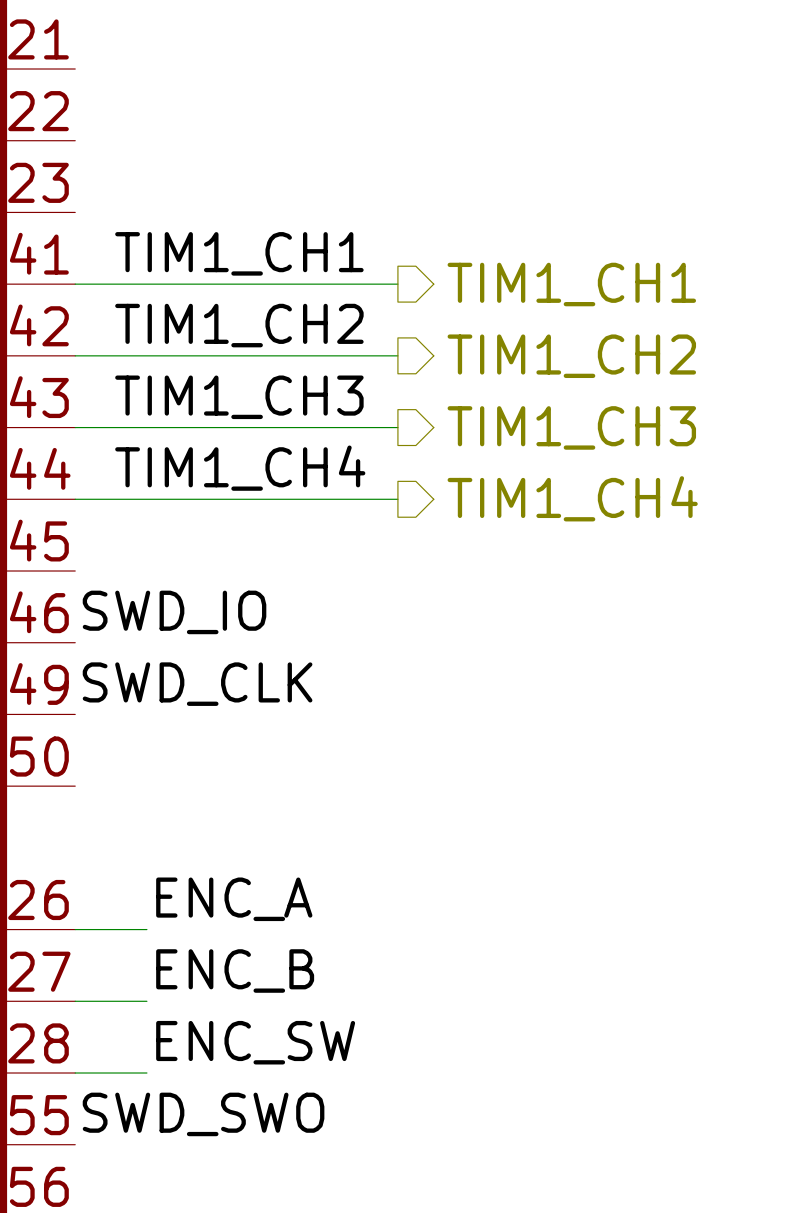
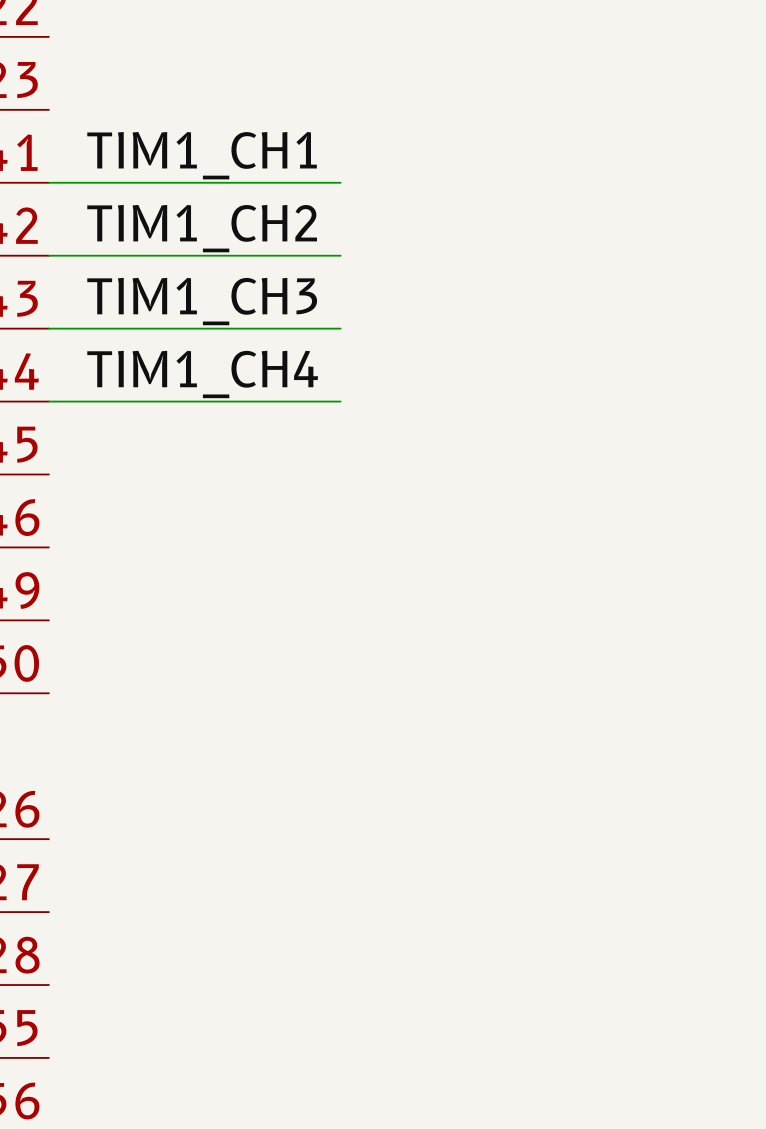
wire: (362, 284) (397, 284) -> none
hierarchical label: TIM1_CH1 (571, 284) -> none
wire: (362, 355) (397, 355) -> none
hierarchical label: TIM1_CH2 (571, 356) -> none
wire: (362, 427) (397, 427) -> none
hierarchical label: TIM1_CH3 (571, 427) -> none
hierarchical label: TIM1_CH4 (572, 498) -> none
wire: (362, 499) (397, 499) -> none
label: SWD_IO (174, 612) -> none
label: SWD_CLK (197, 684) -> none
label: ENC_A (234, 899) -> none
wire: (75, 929) (146, 929) -> none
label: ENC_B (235, 970) -> none
wire: (75, 1001) (146, 1001) -> none
label: ENC_SW (255, 1042) -> none
wire: (75, 1073) (146, 1073) -> none
label: SWD_SWO (203, 1114) -> none

